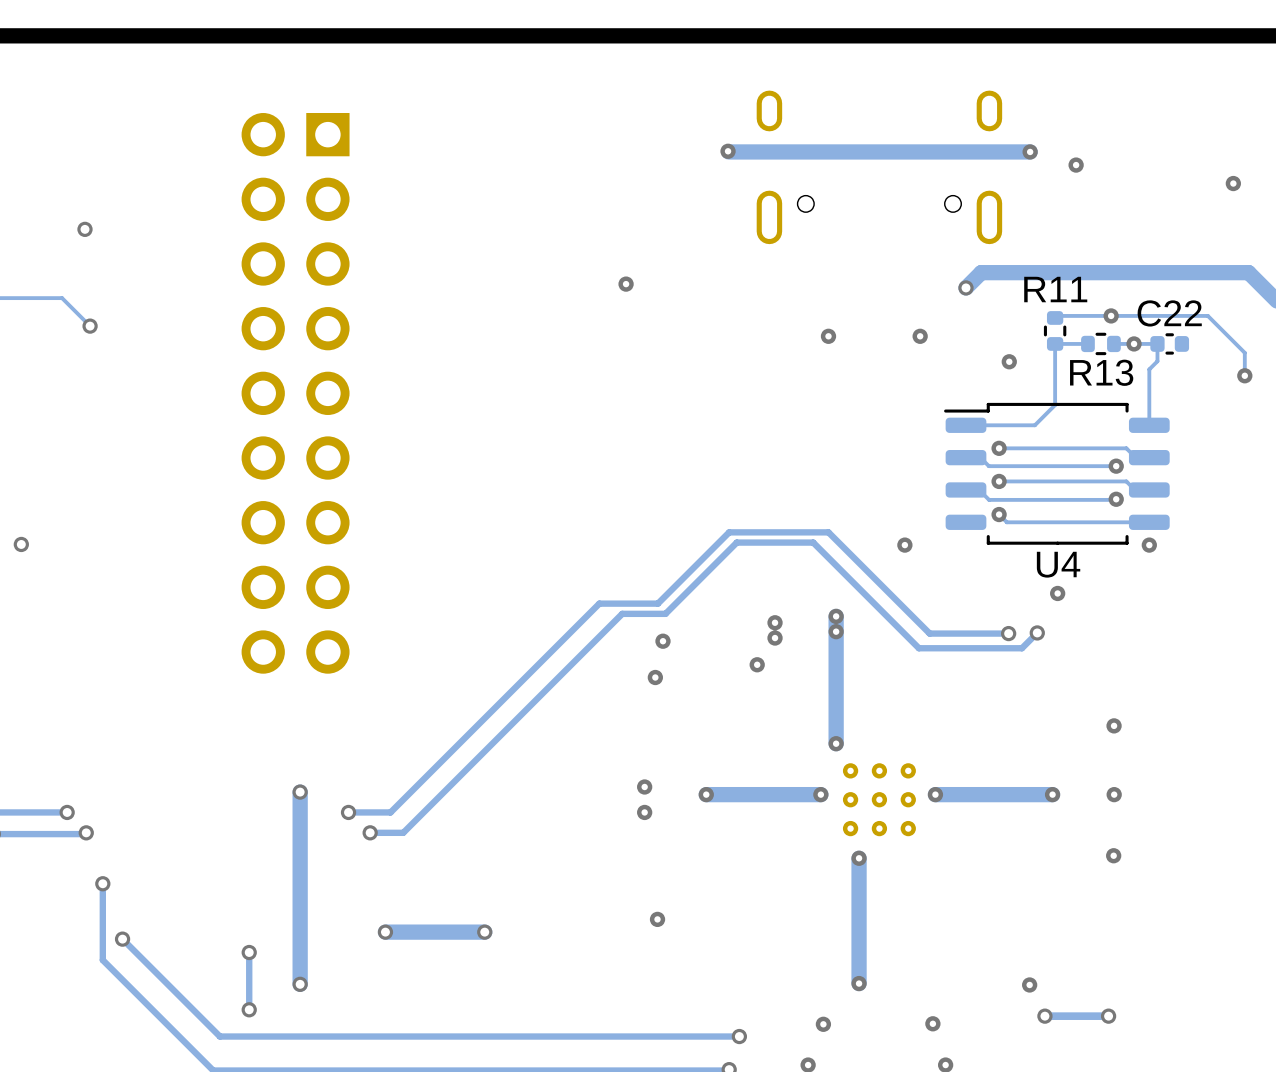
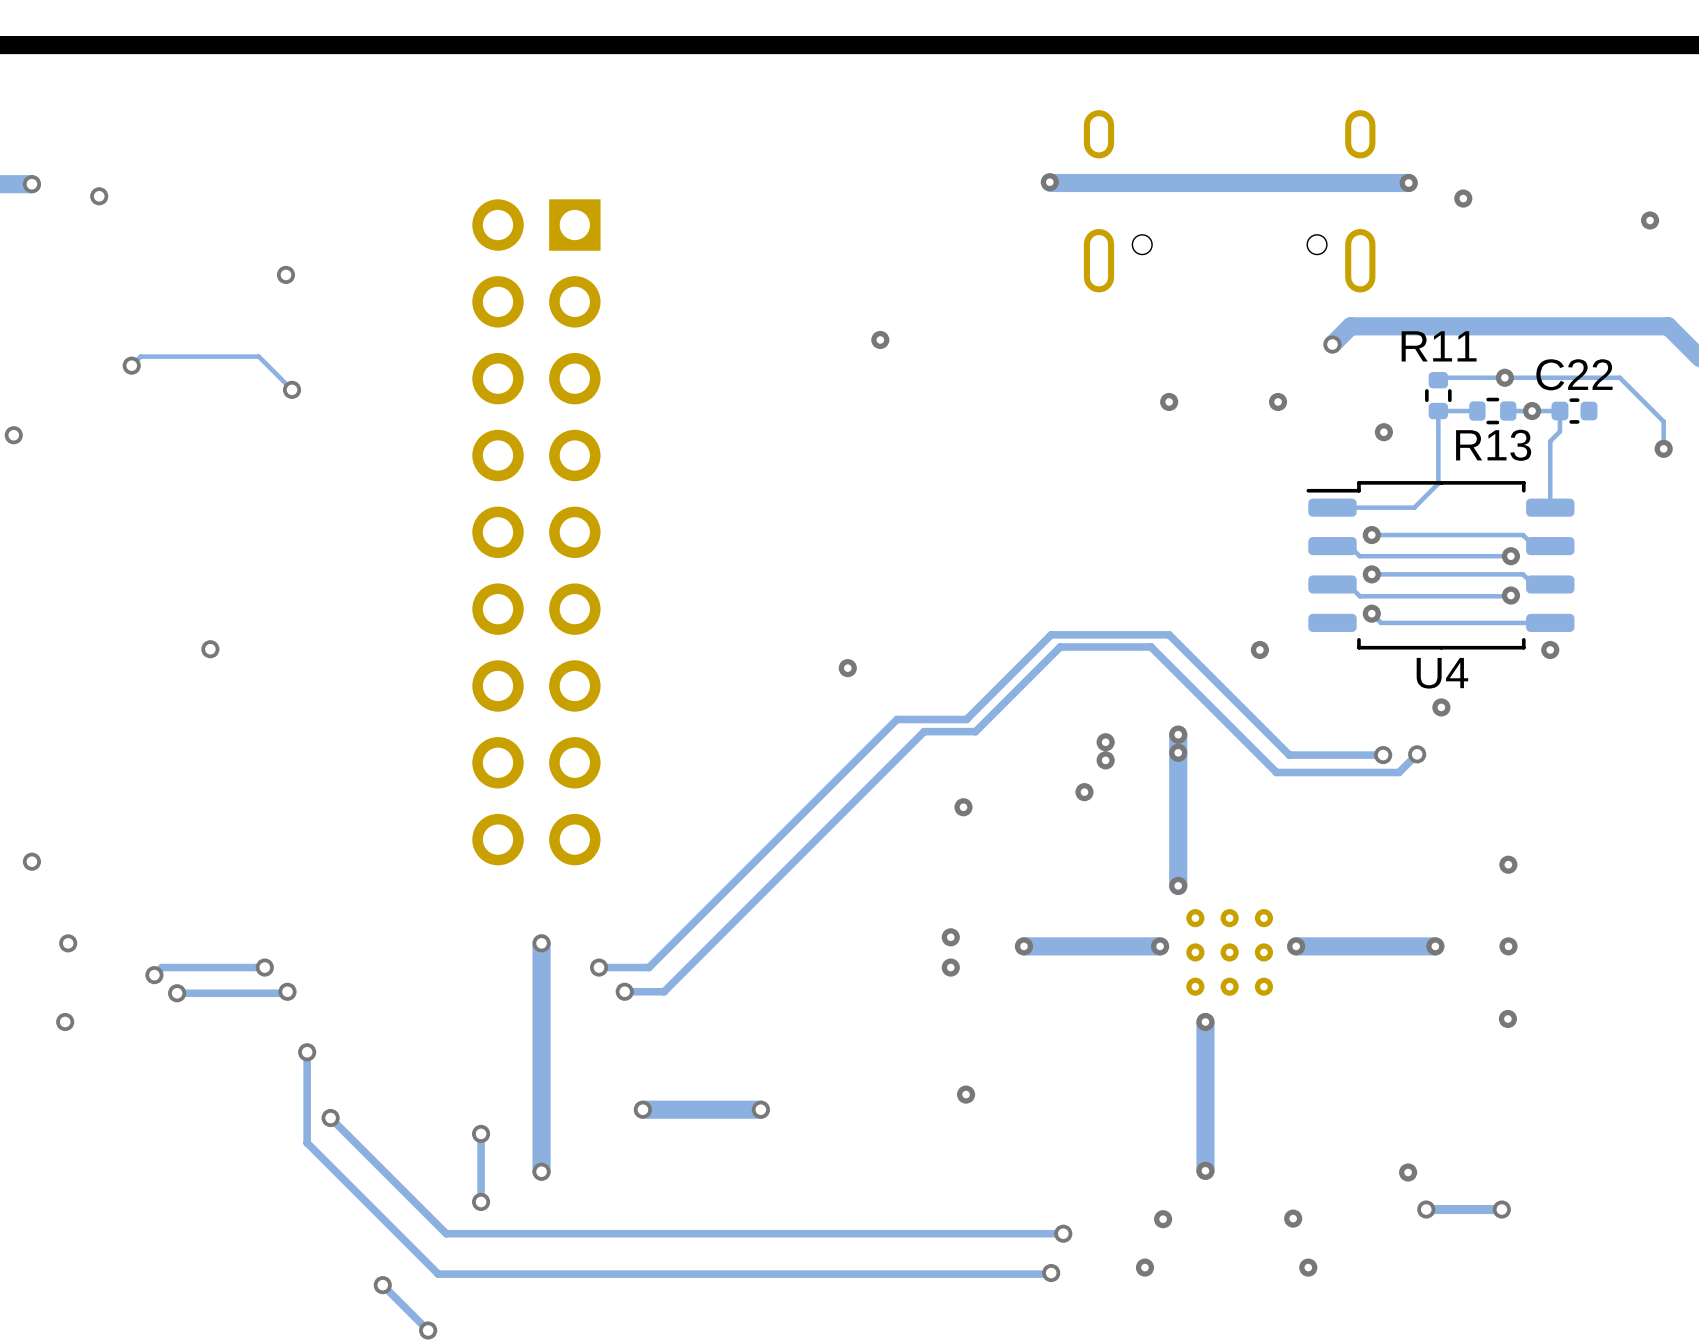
via position: (626, 284) -> (880, 339)
part position: (295, 393) -> (536, 532)
via position: (662, 641) -> (847, 668)

